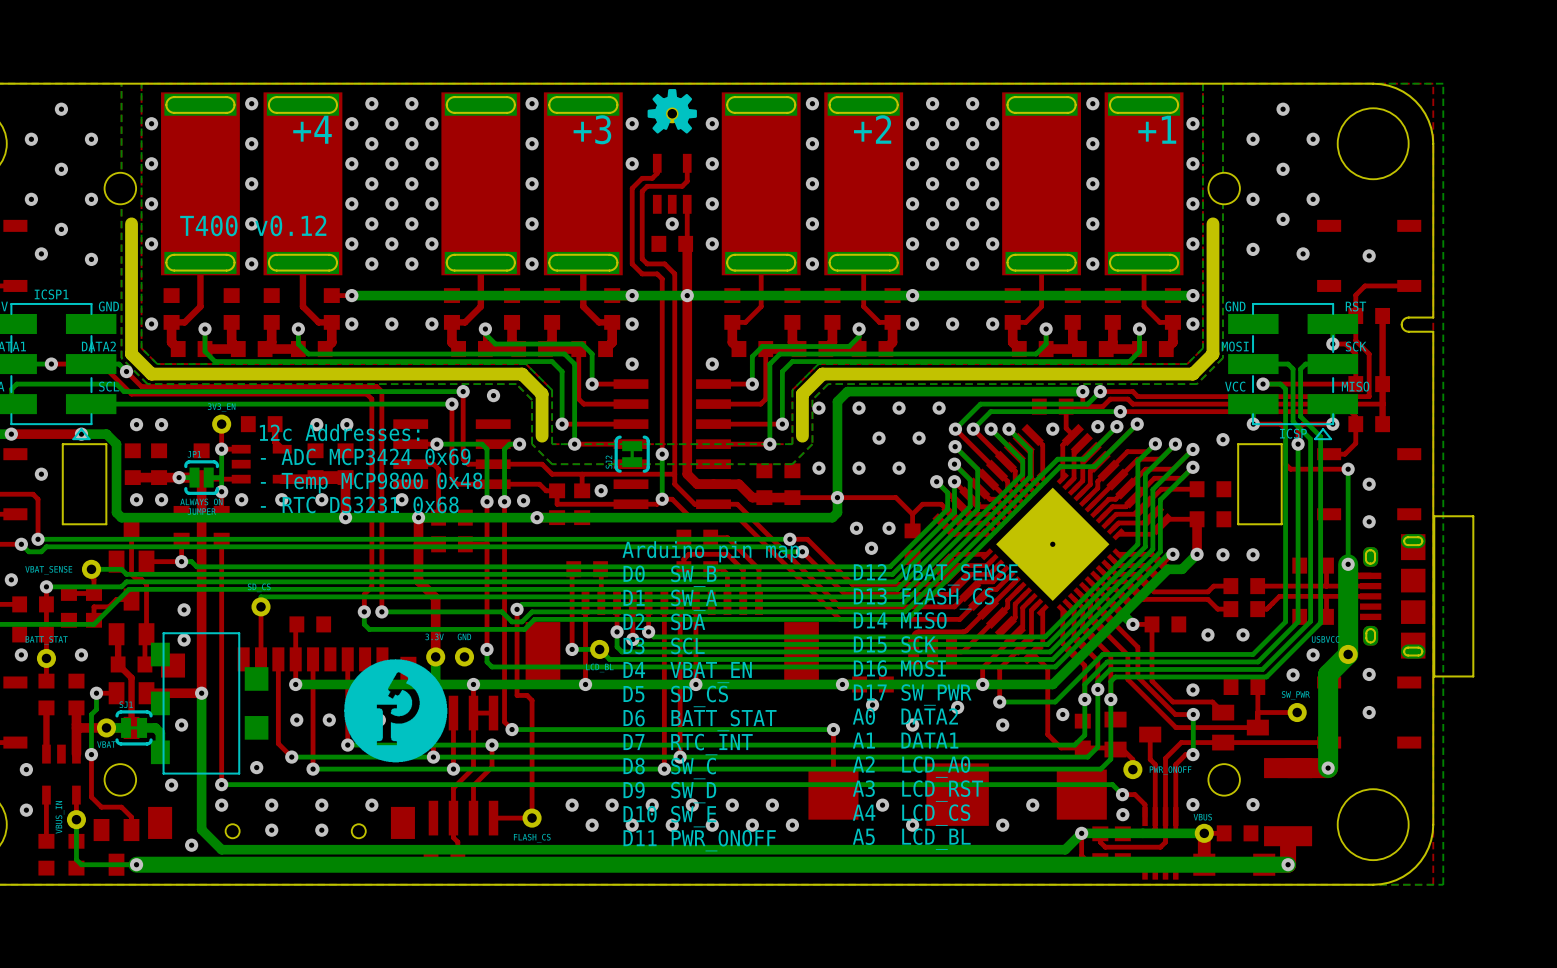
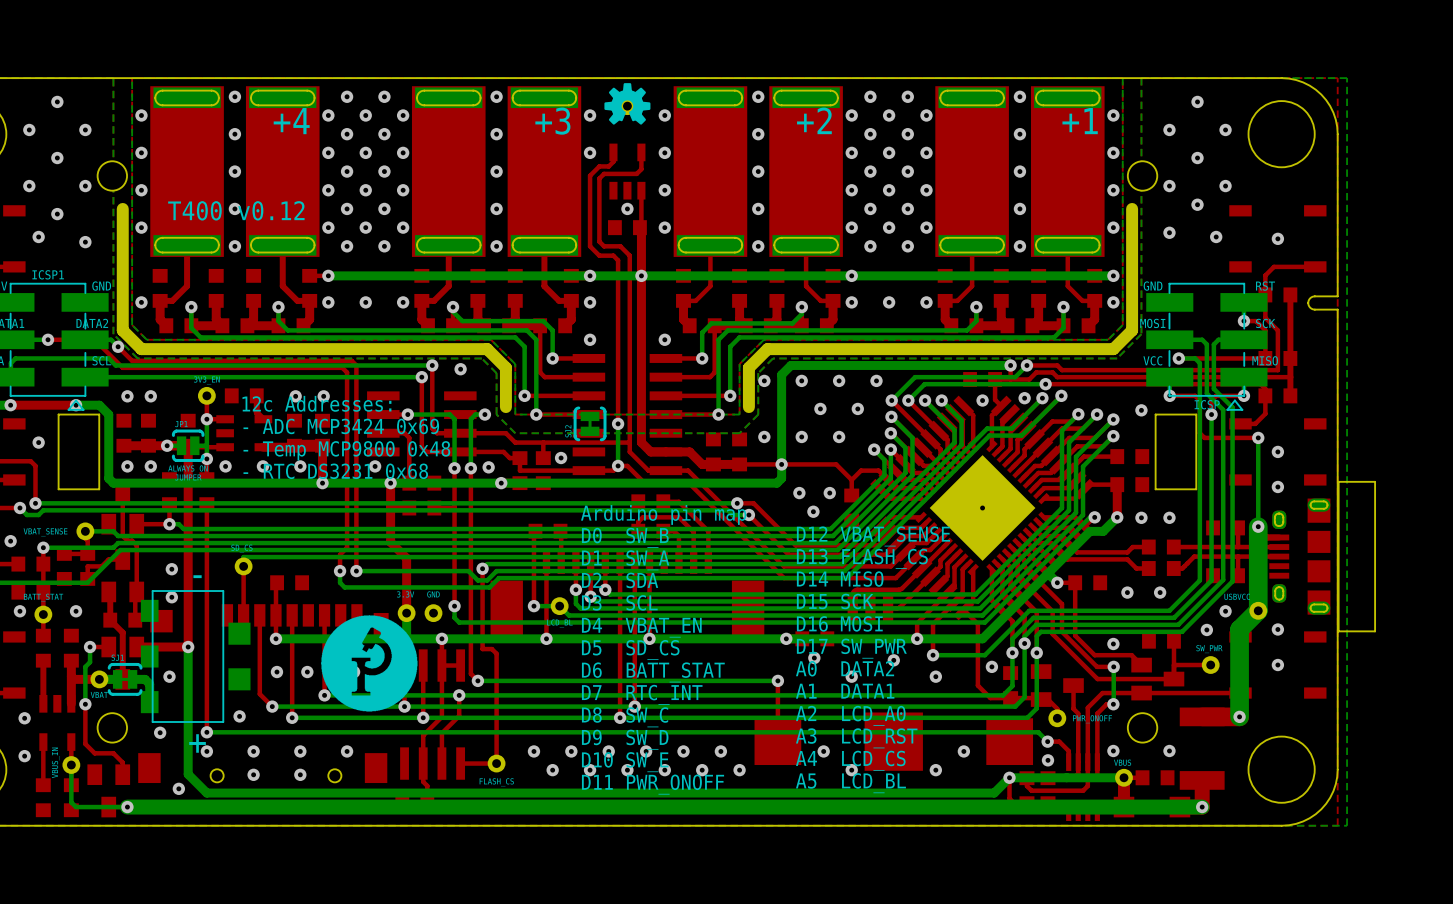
text: none -> - (197, 576)
text: none -> + (197, 743)

